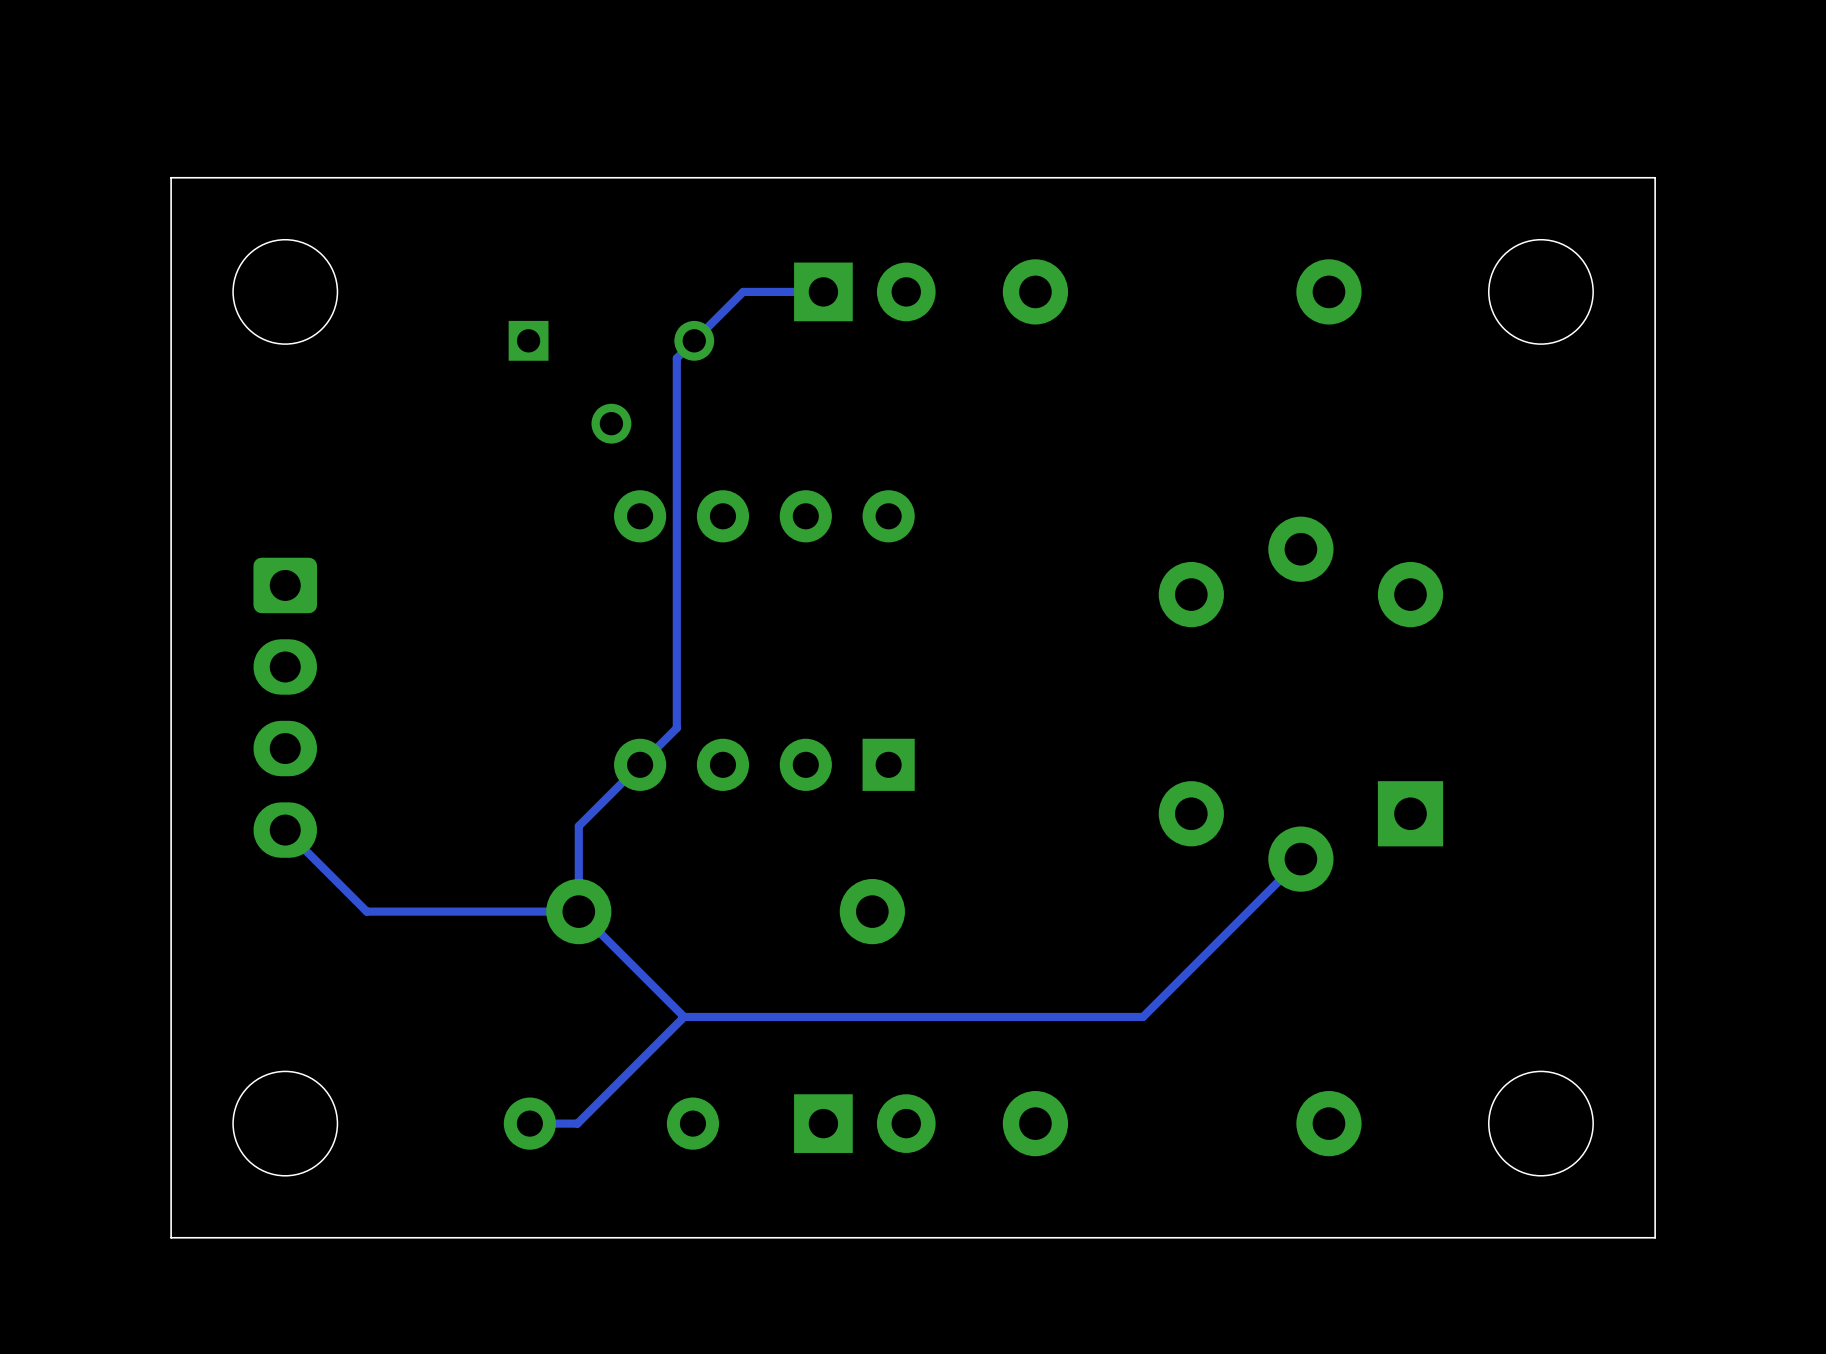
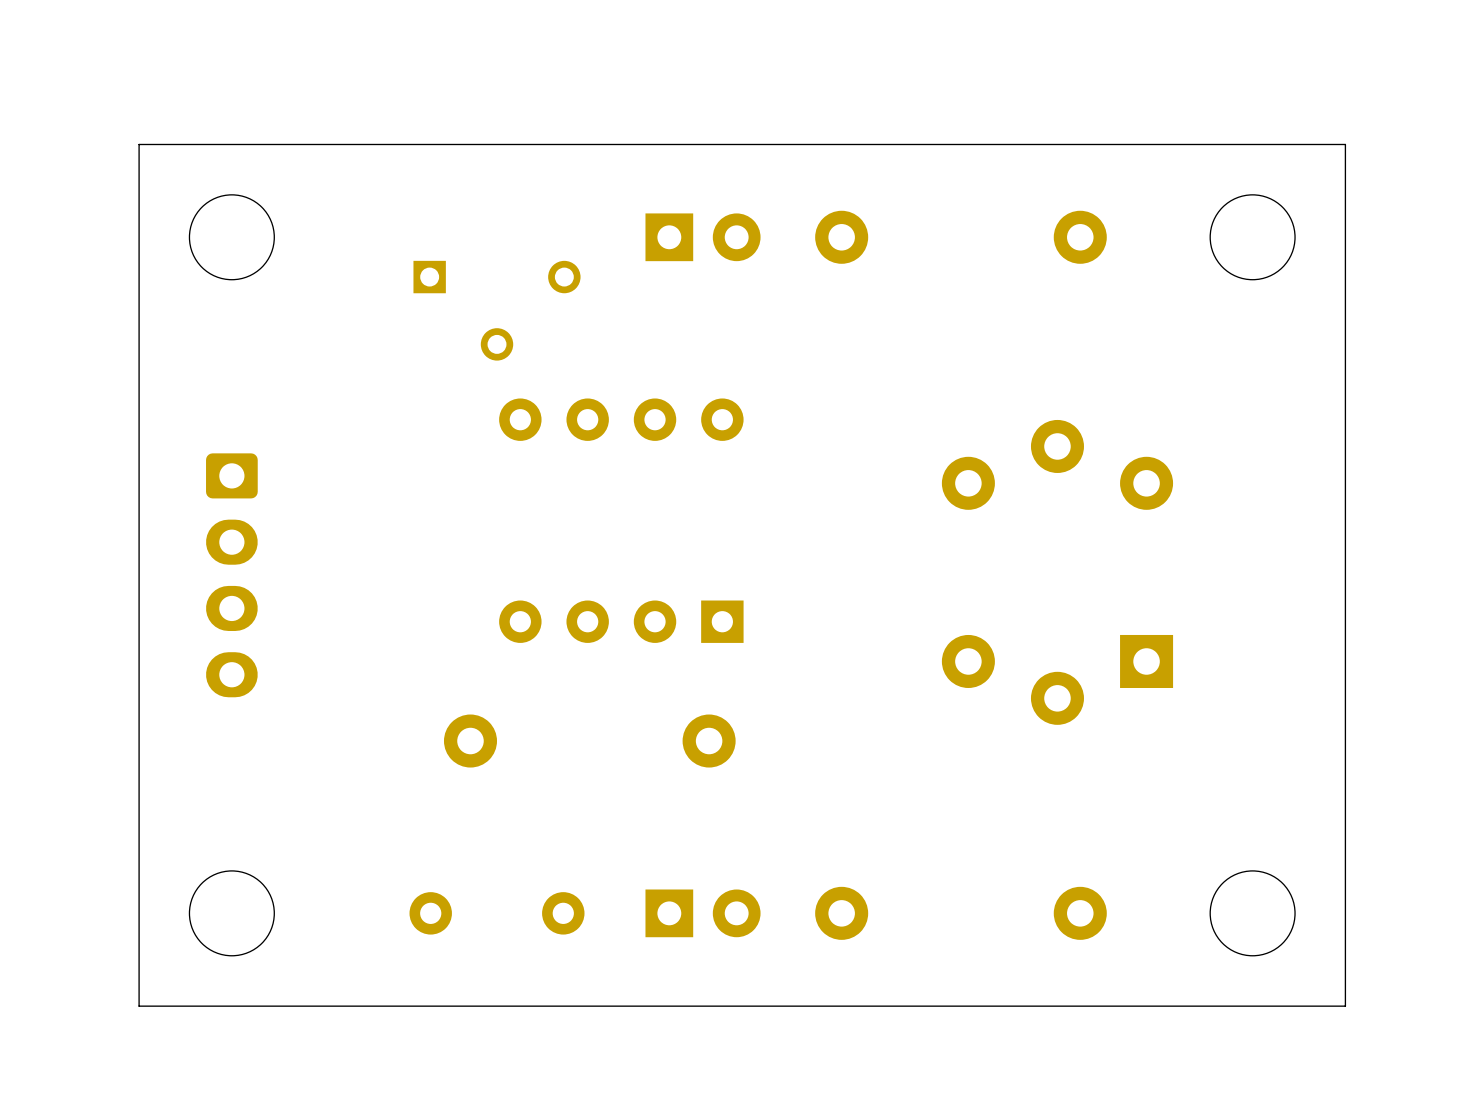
track: (823, 291) (743, 291) (676, 358) (676, 728) (578, 826) (578, 911) -> none
track: (285, 830) (366, 911) (578, 911) -> none
track: (1300, 859) (1143, 1016) (684, 1016) -> none
track: (578, 911) (684, 1016) -> none
track: (684, 1016) (577, 1123) (529, 1123) -> none

